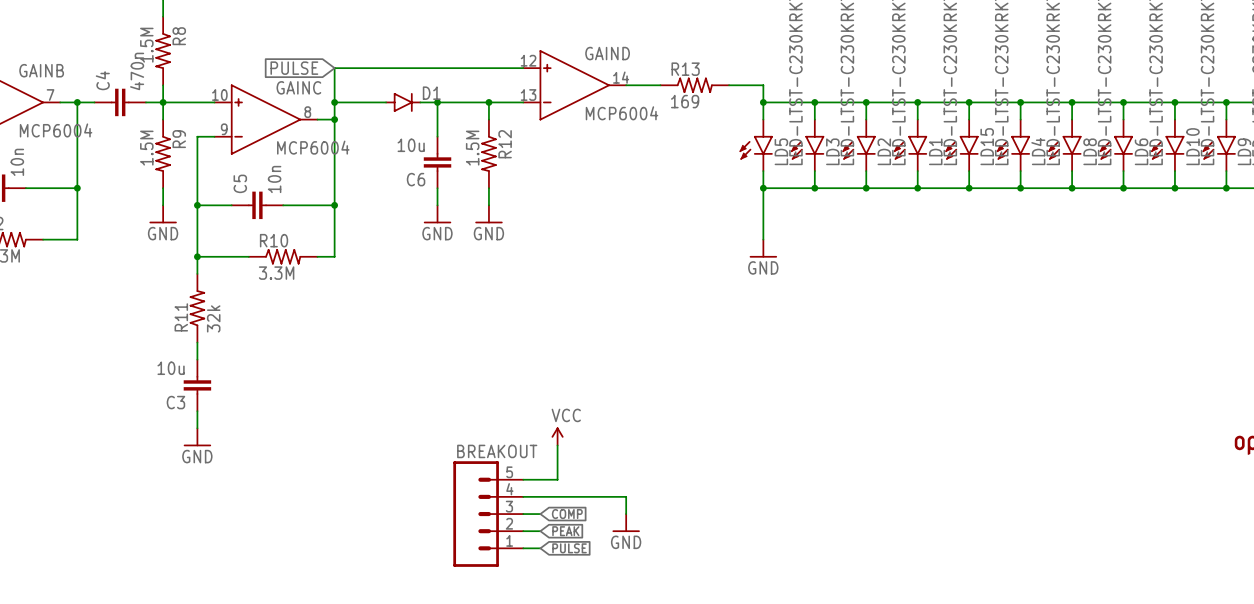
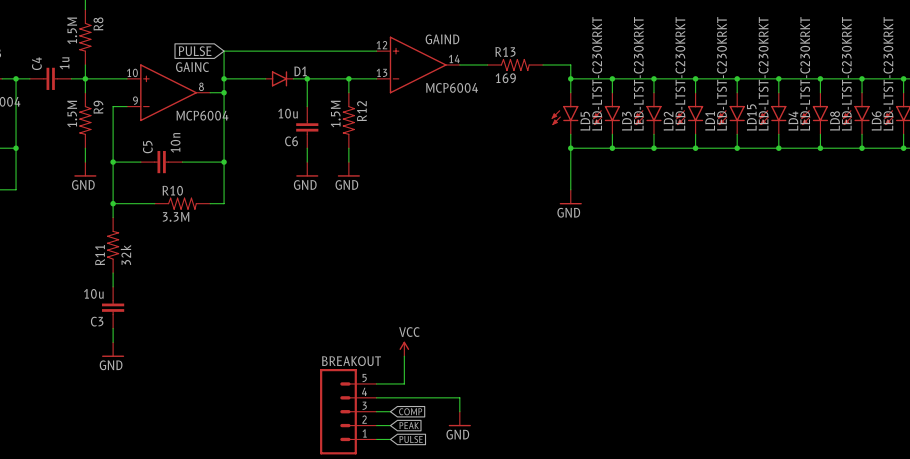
C4 value: 470n (137, 71) -> 1u (64, 63)

